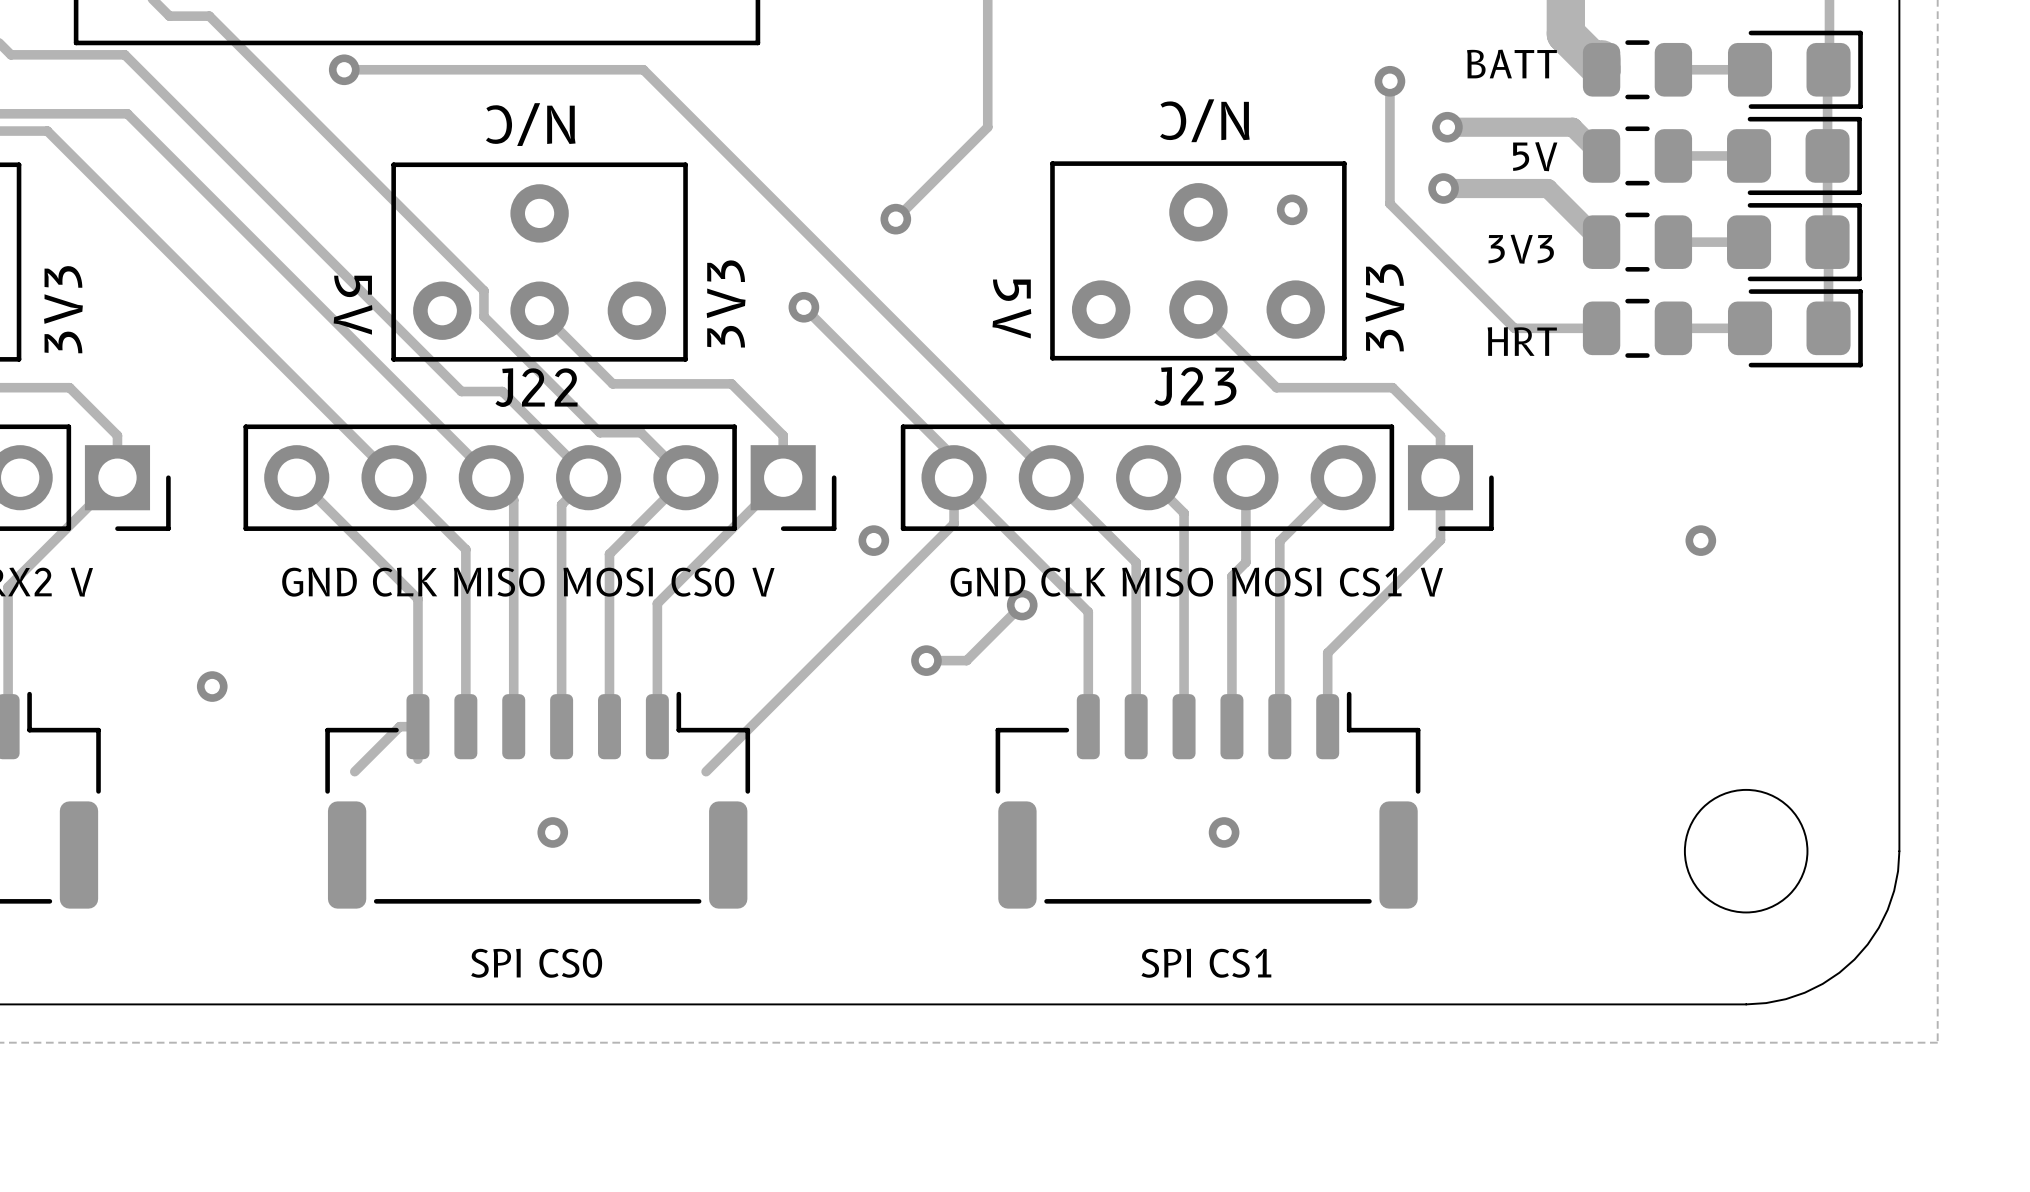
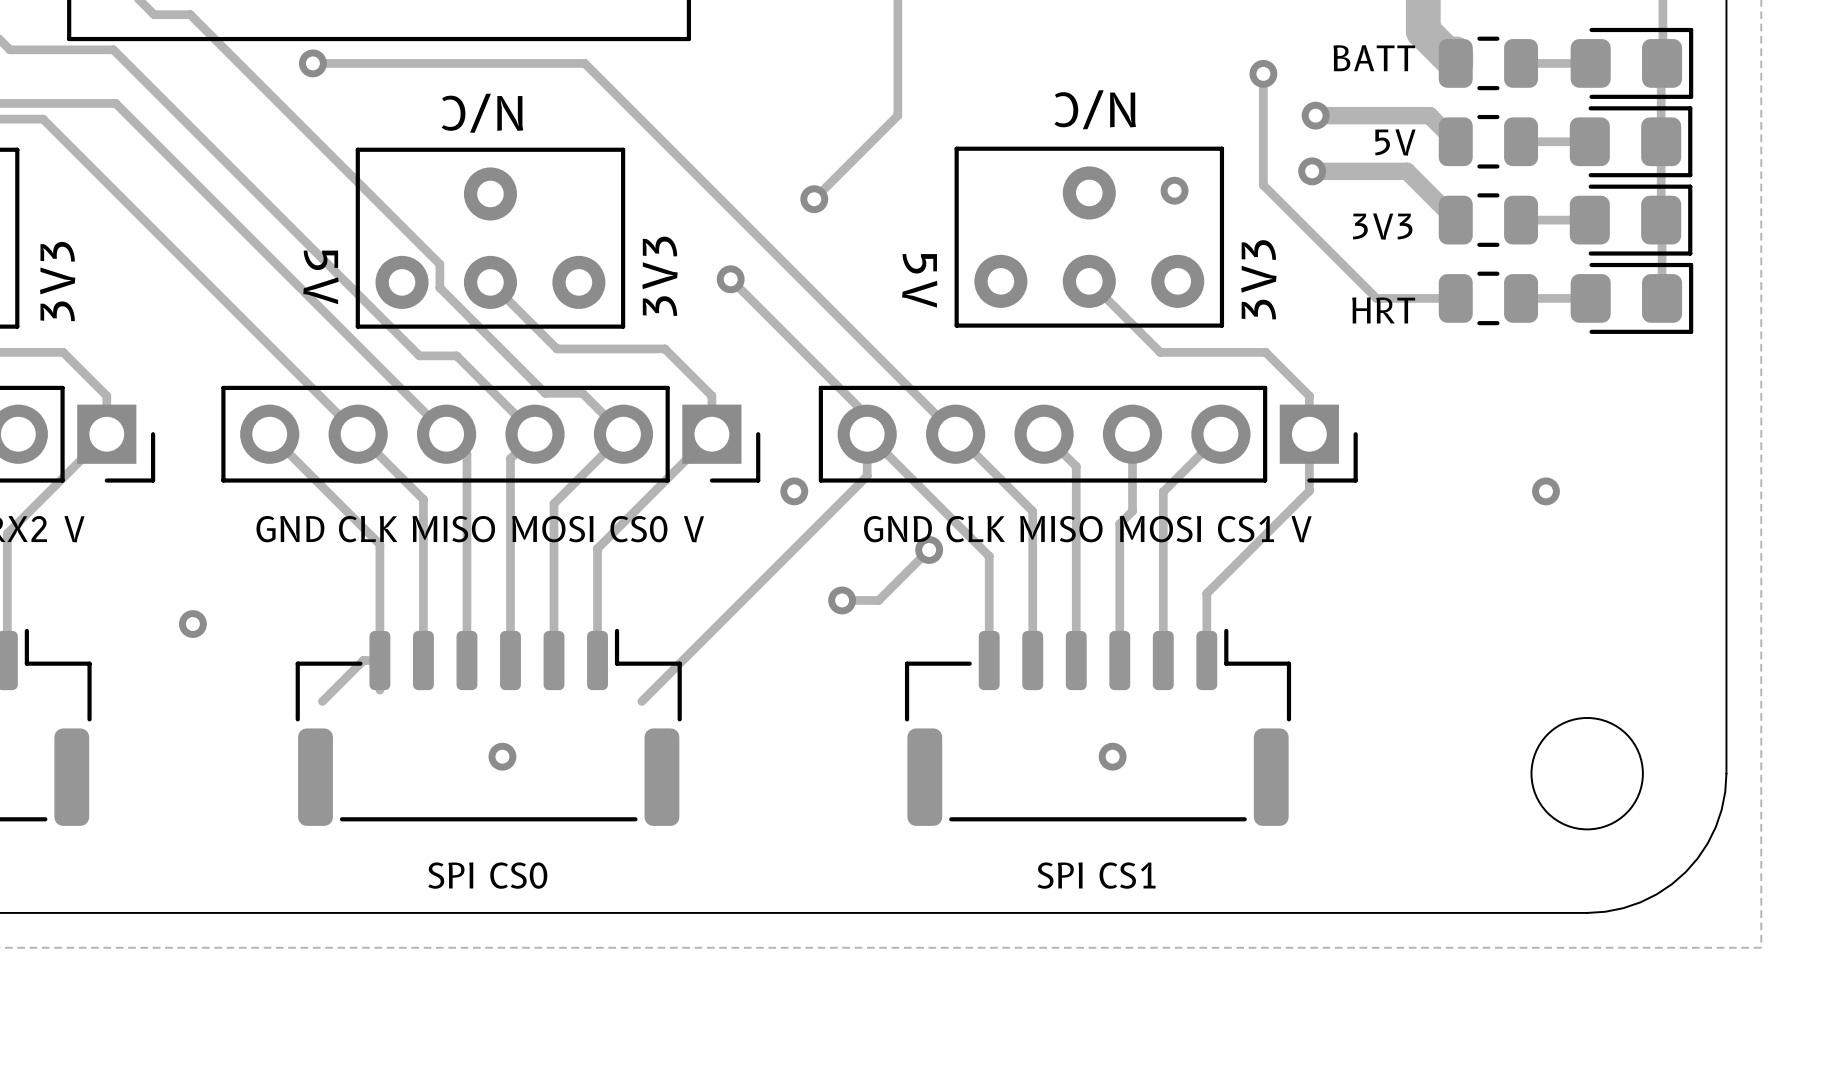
J23 name: J23 (1195, 386) -> none
J22 name: J22 (536, 387) -> none

